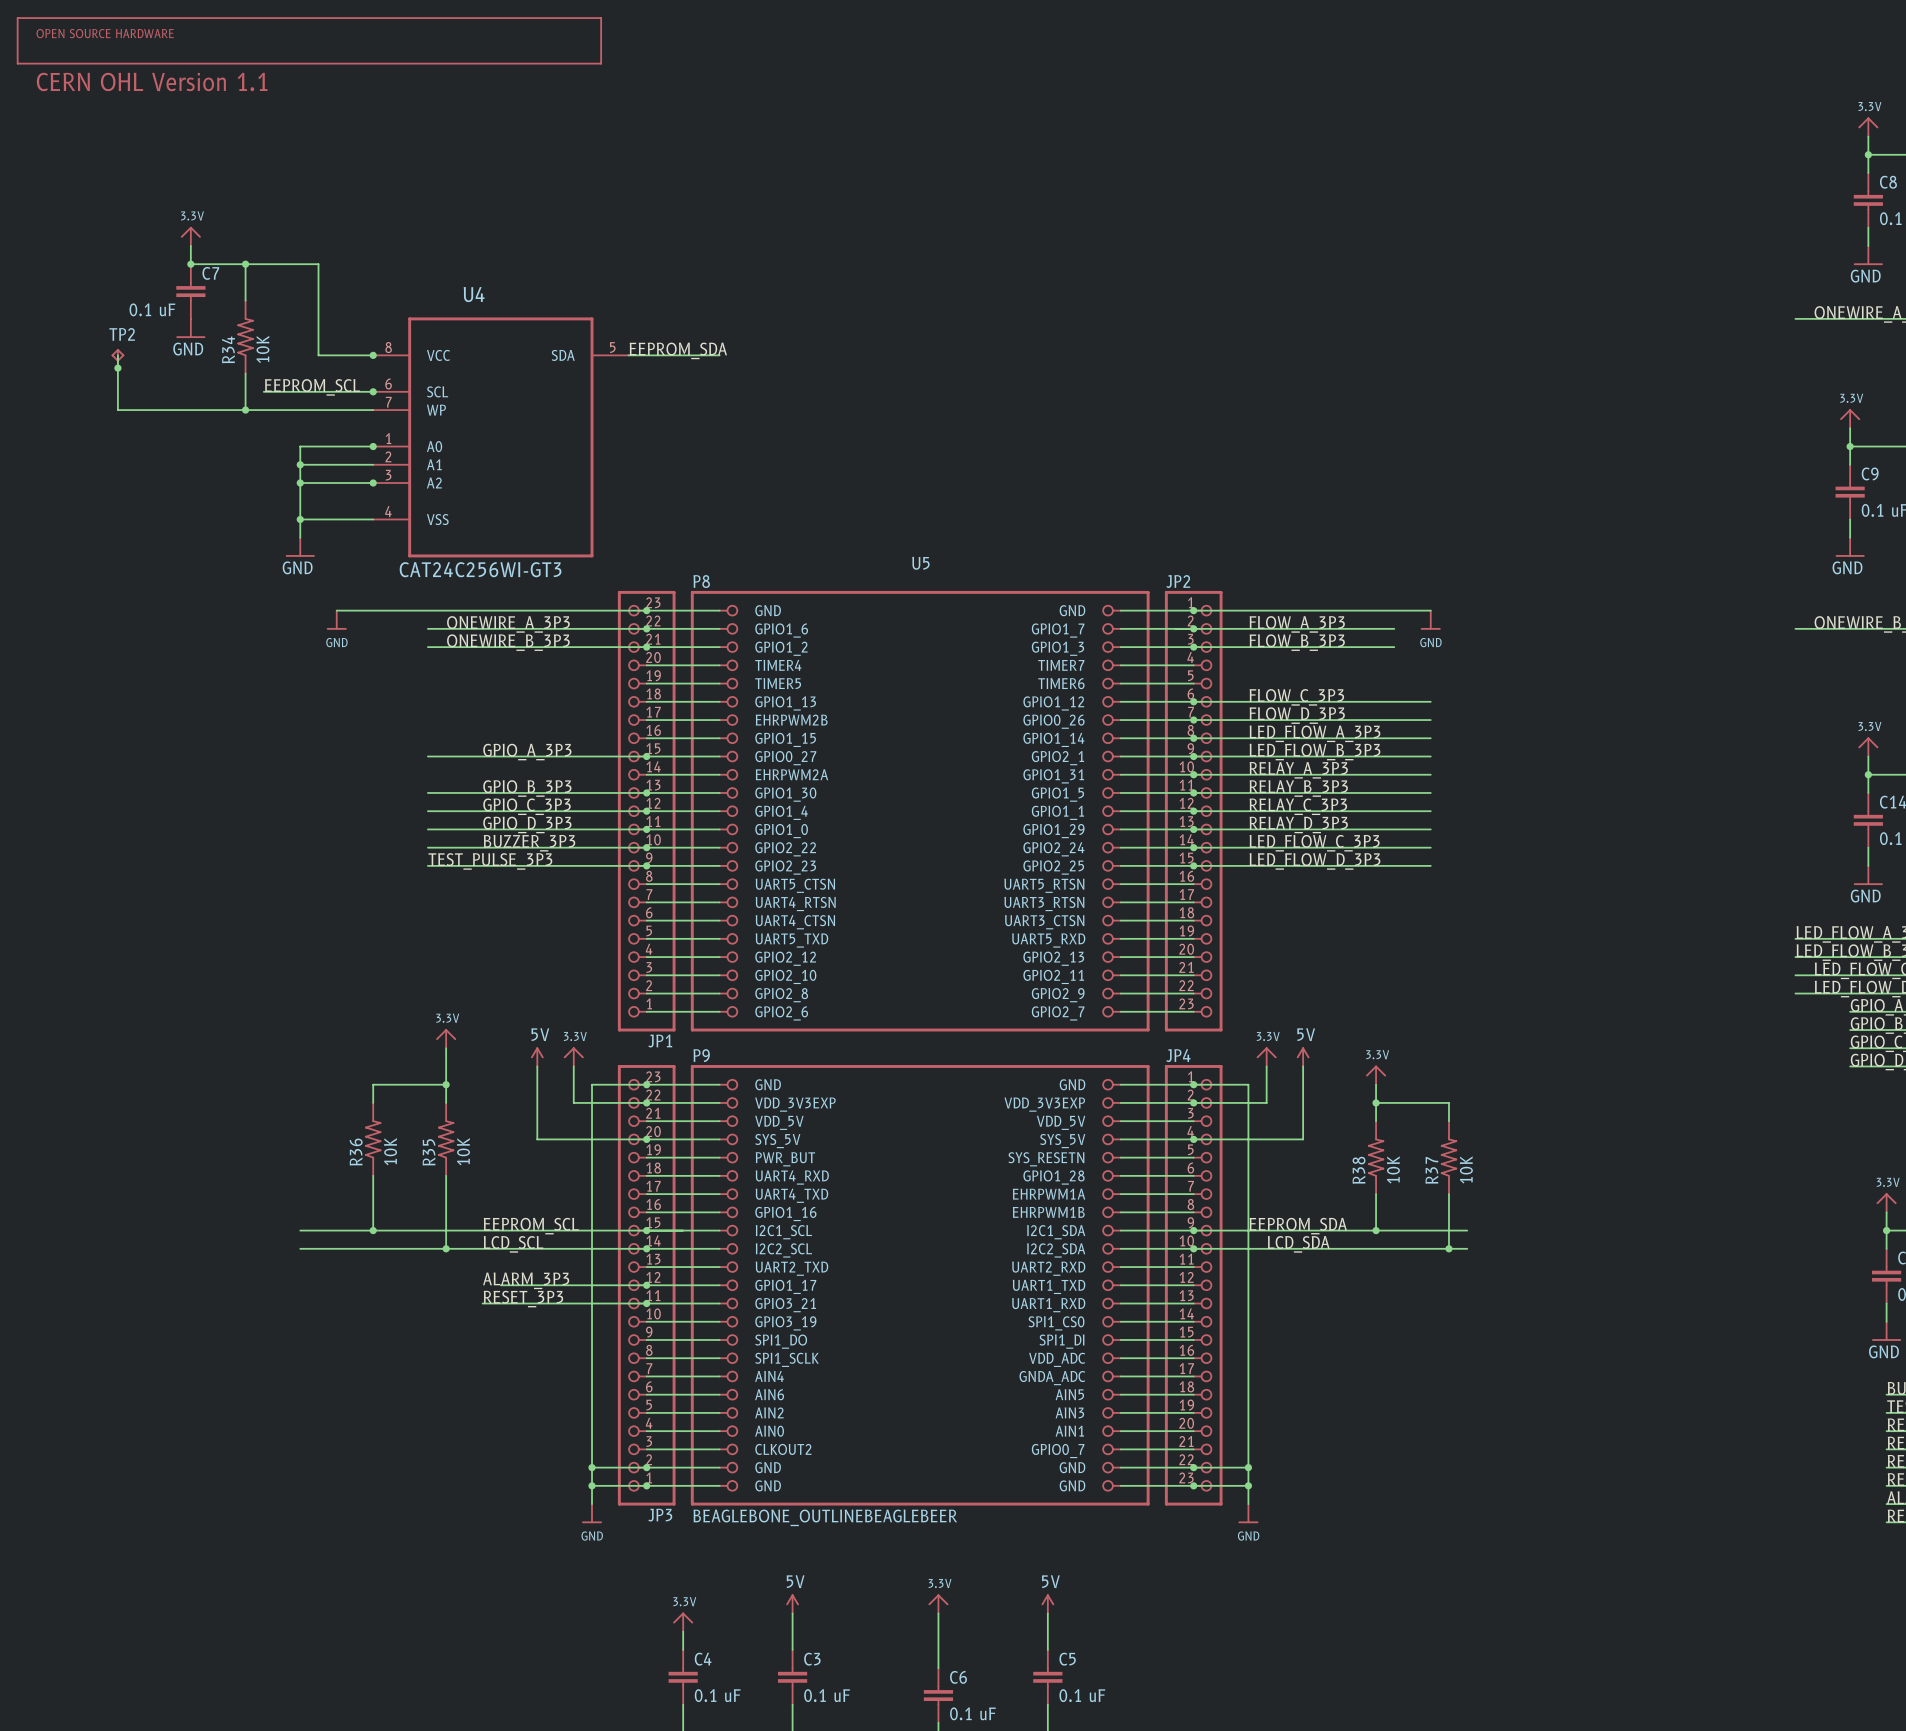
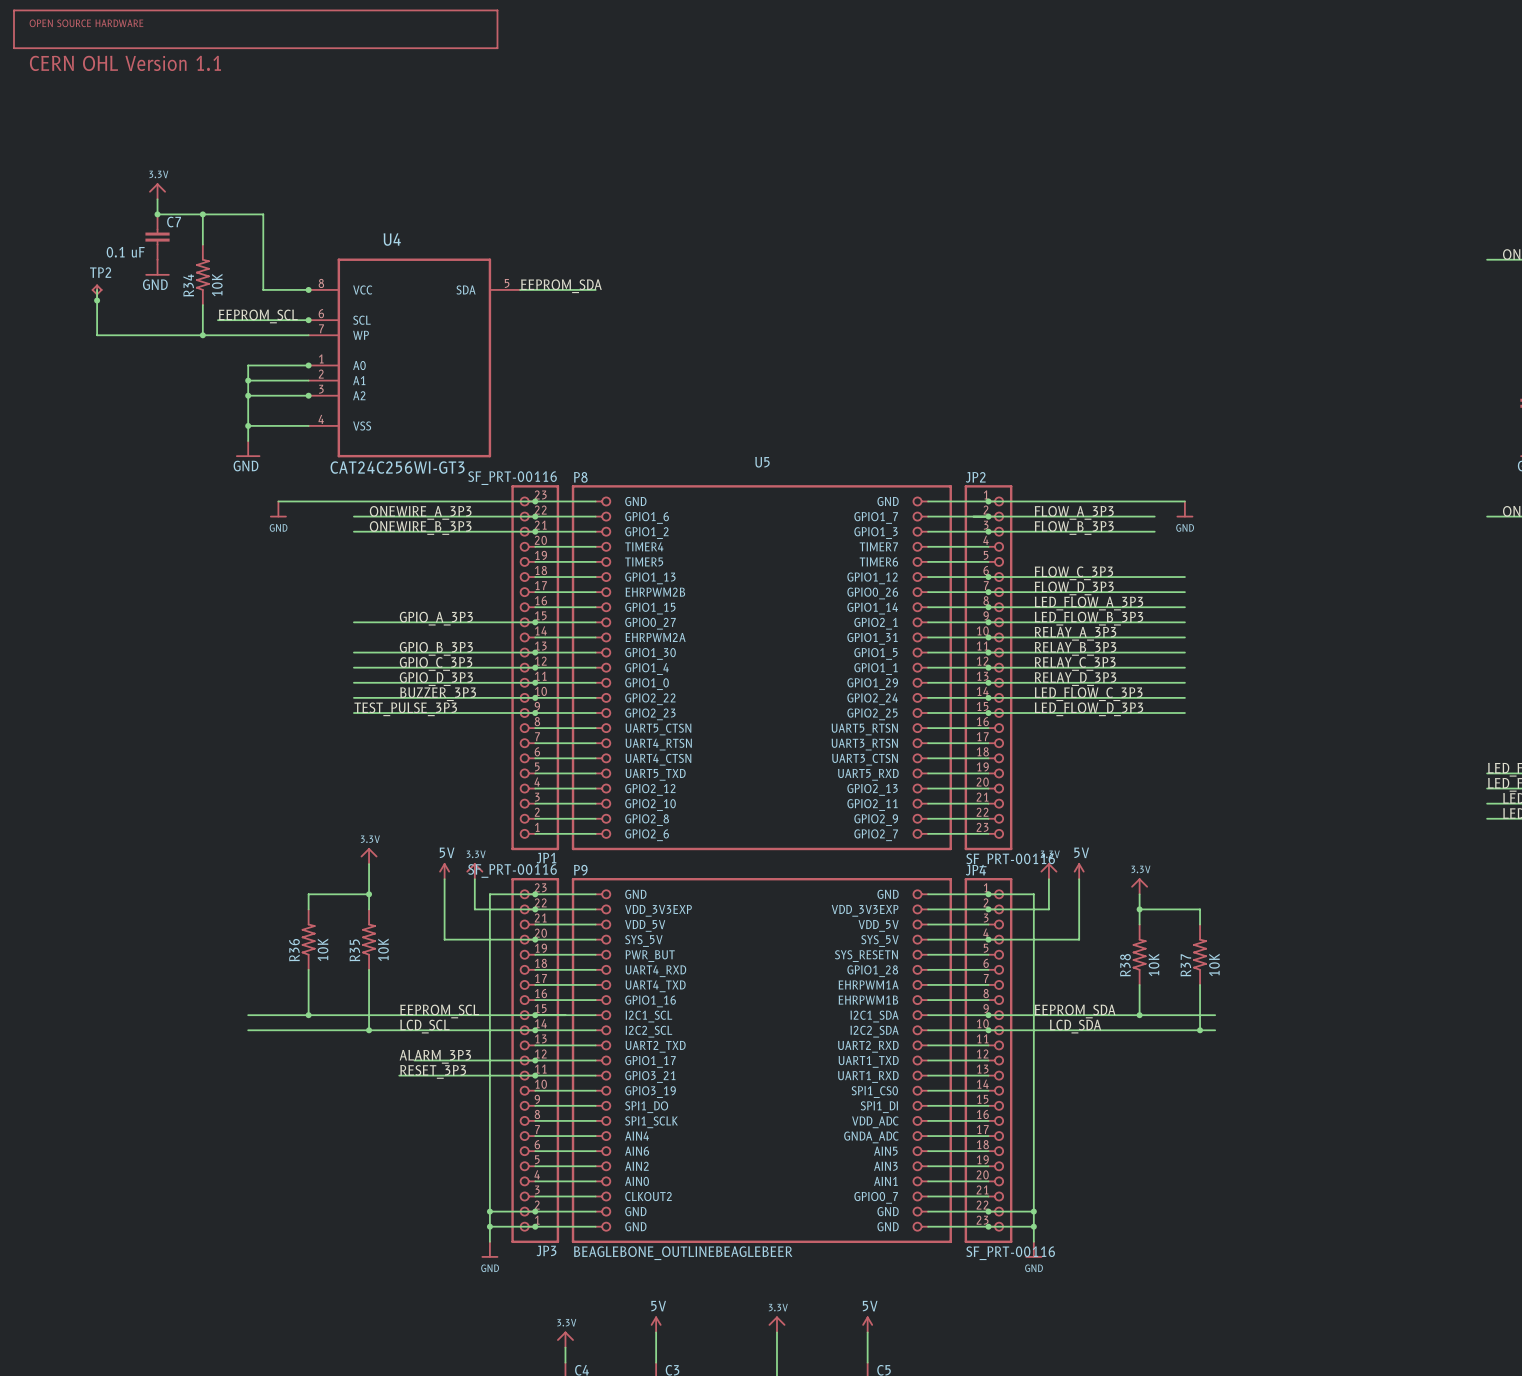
JP1 value: none -> SF_PRT-00116 (512, 478)
JP2 value: none -> SF_PRT-00116 (1010, 860)
JP3 value: none -> SF_PRT-00116 (512, 870)
JP4 value: none -> SF_PRT-00116 (1010, 1253)

